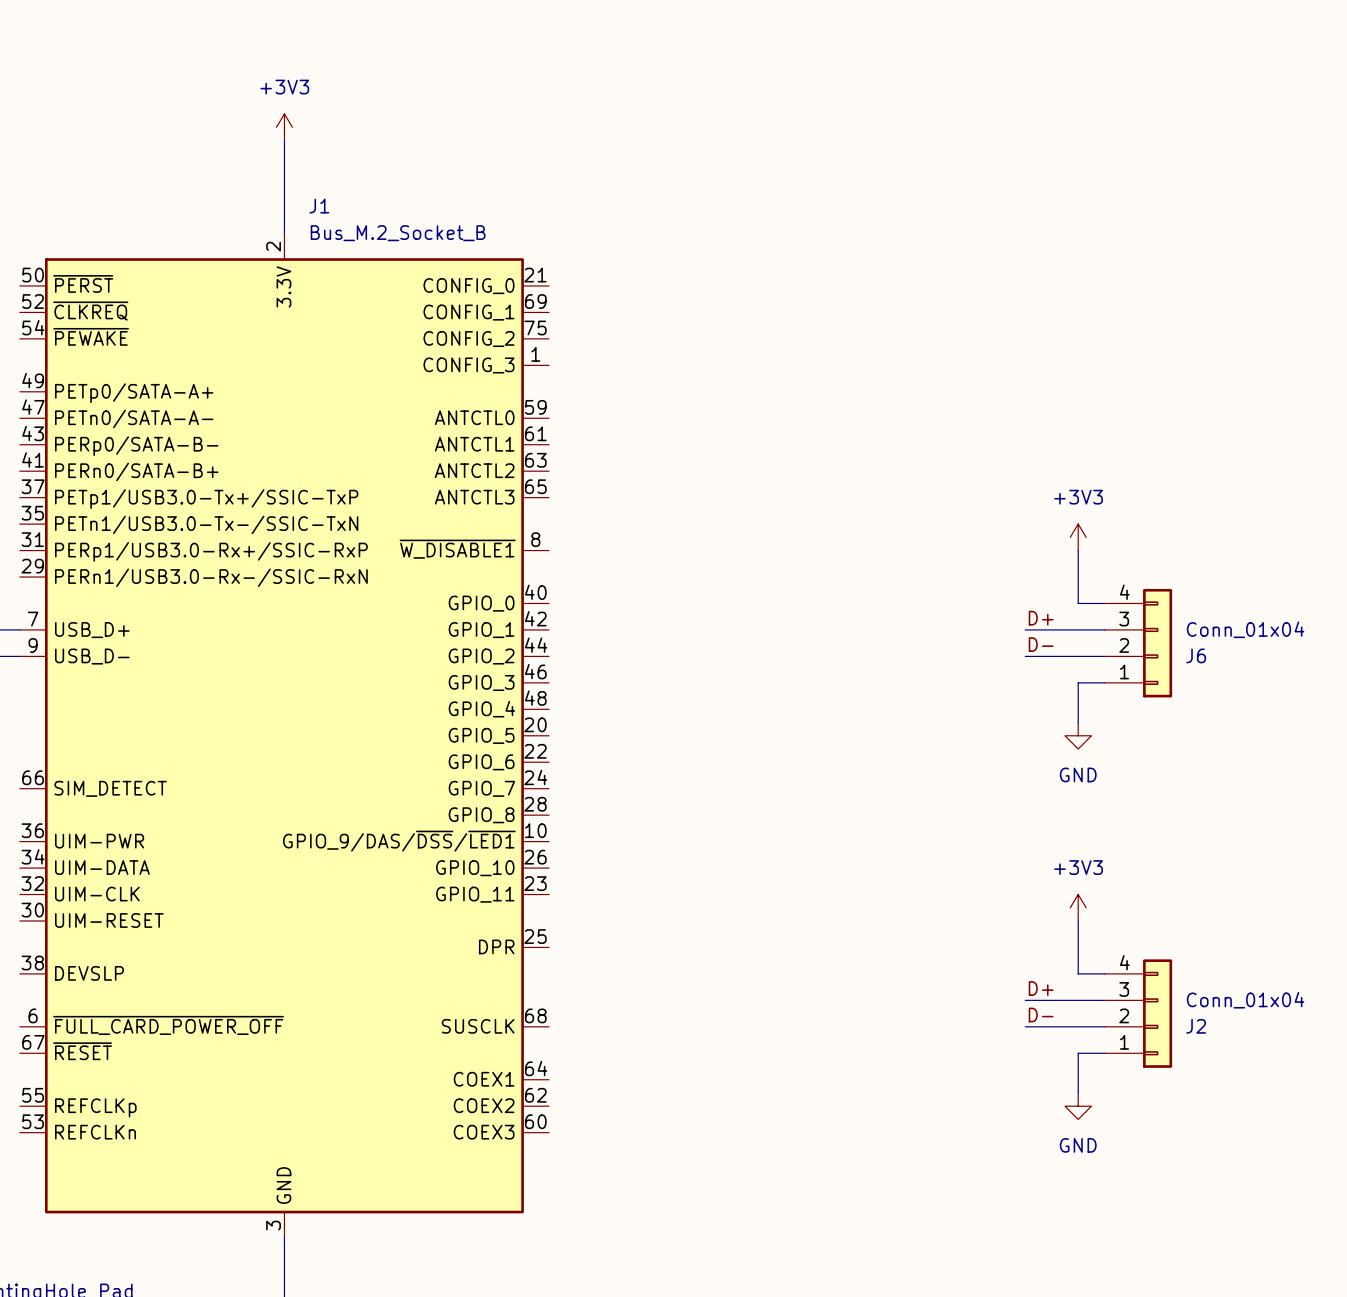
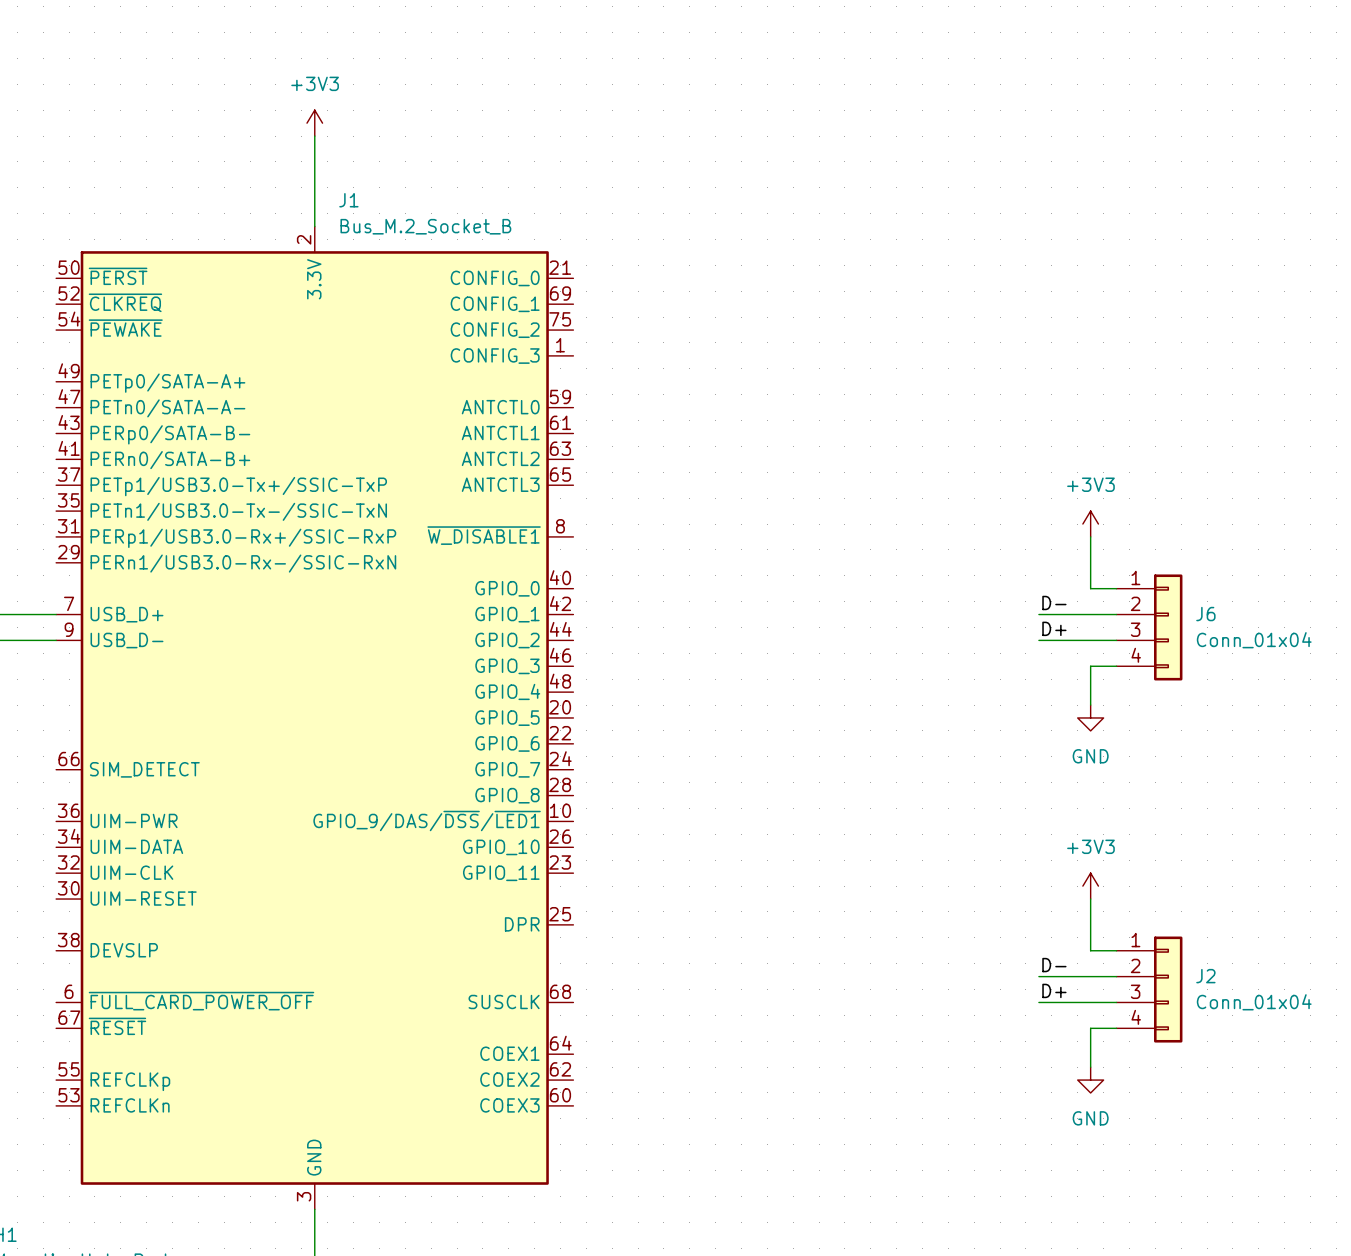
label: D+ (1041, 618) -> D- (1054, 602)
J6 flip: as is (1157, 643) -> up-down (1168, 627)
label: D- (1041, 644) -> D+ (1054, 628)
label: D+ (1041, 988) -> D- (1054, 965)
J2 flip: as is (1157, 1013) -> up-down (1168, 989)
label: D- (1041, 1015) -> D+ (1054, 990)

